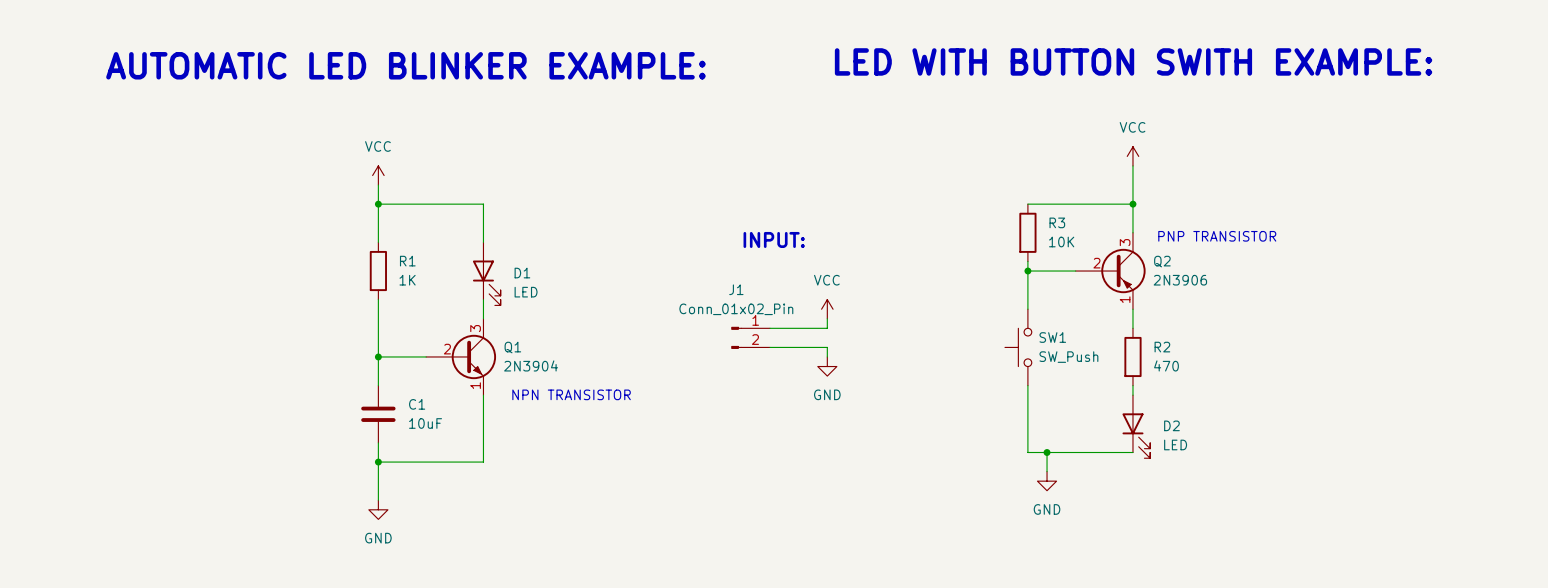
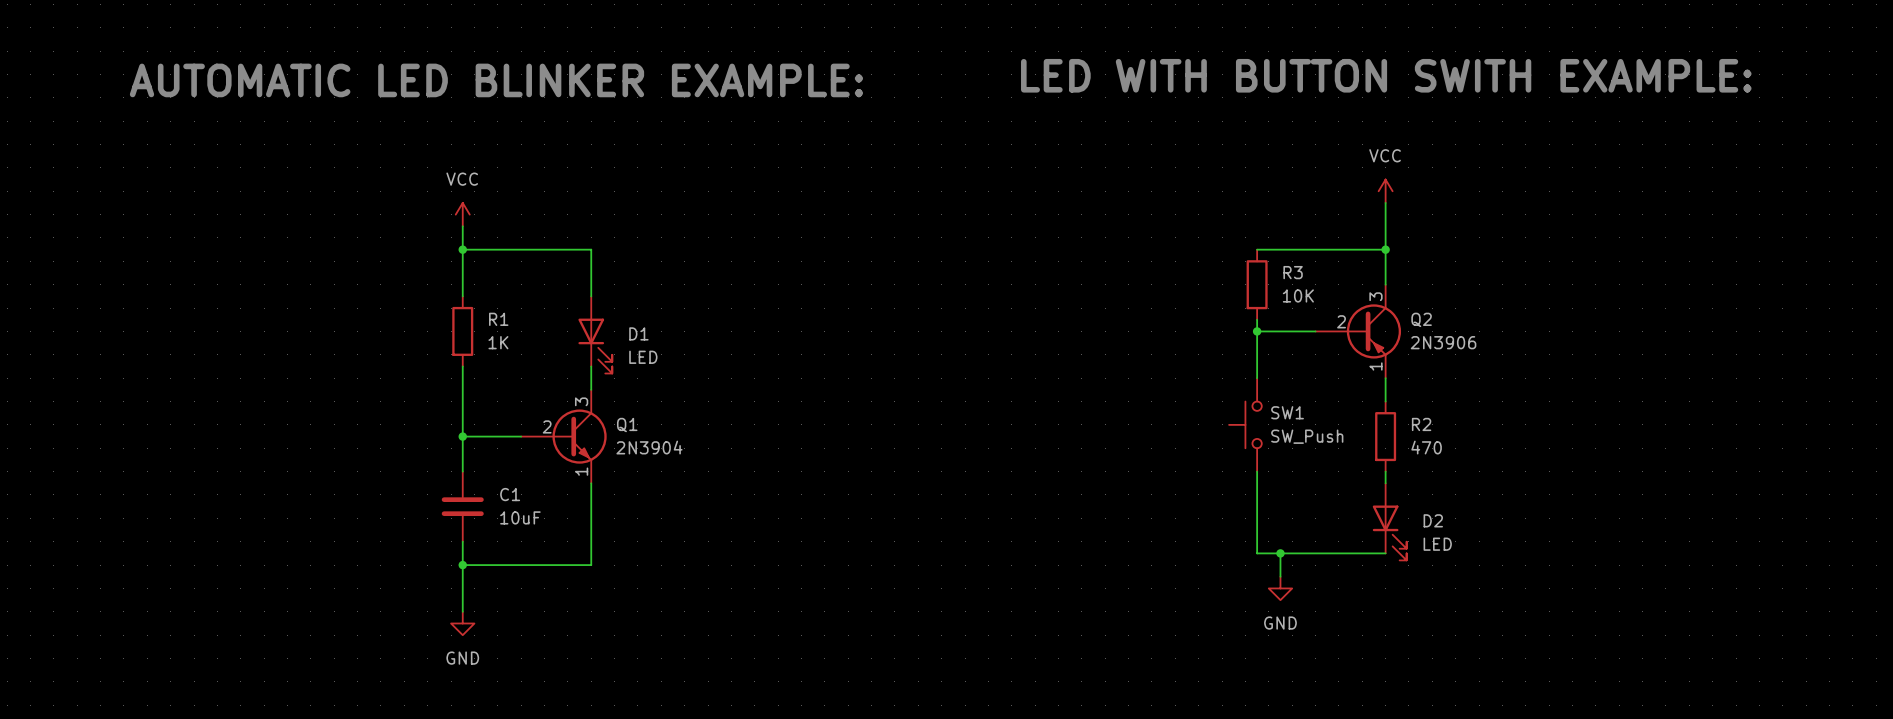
text: PNP TRANSISTOR (1217, 236) -> none
text: INPUT: (774, 239) -> none
power symbol: VCC (827, 309) -> none
wire: (827, 318) (827, 328) (770, 328) -> none
J1: Conn_01x02_Pin (750, 337) -> none
wire: (770, 347) (827, 347) (827, 356) -> none
power symbol: GND (827, 366) -> none
text: NPN TRANSISTOR (571, 394) -> none

